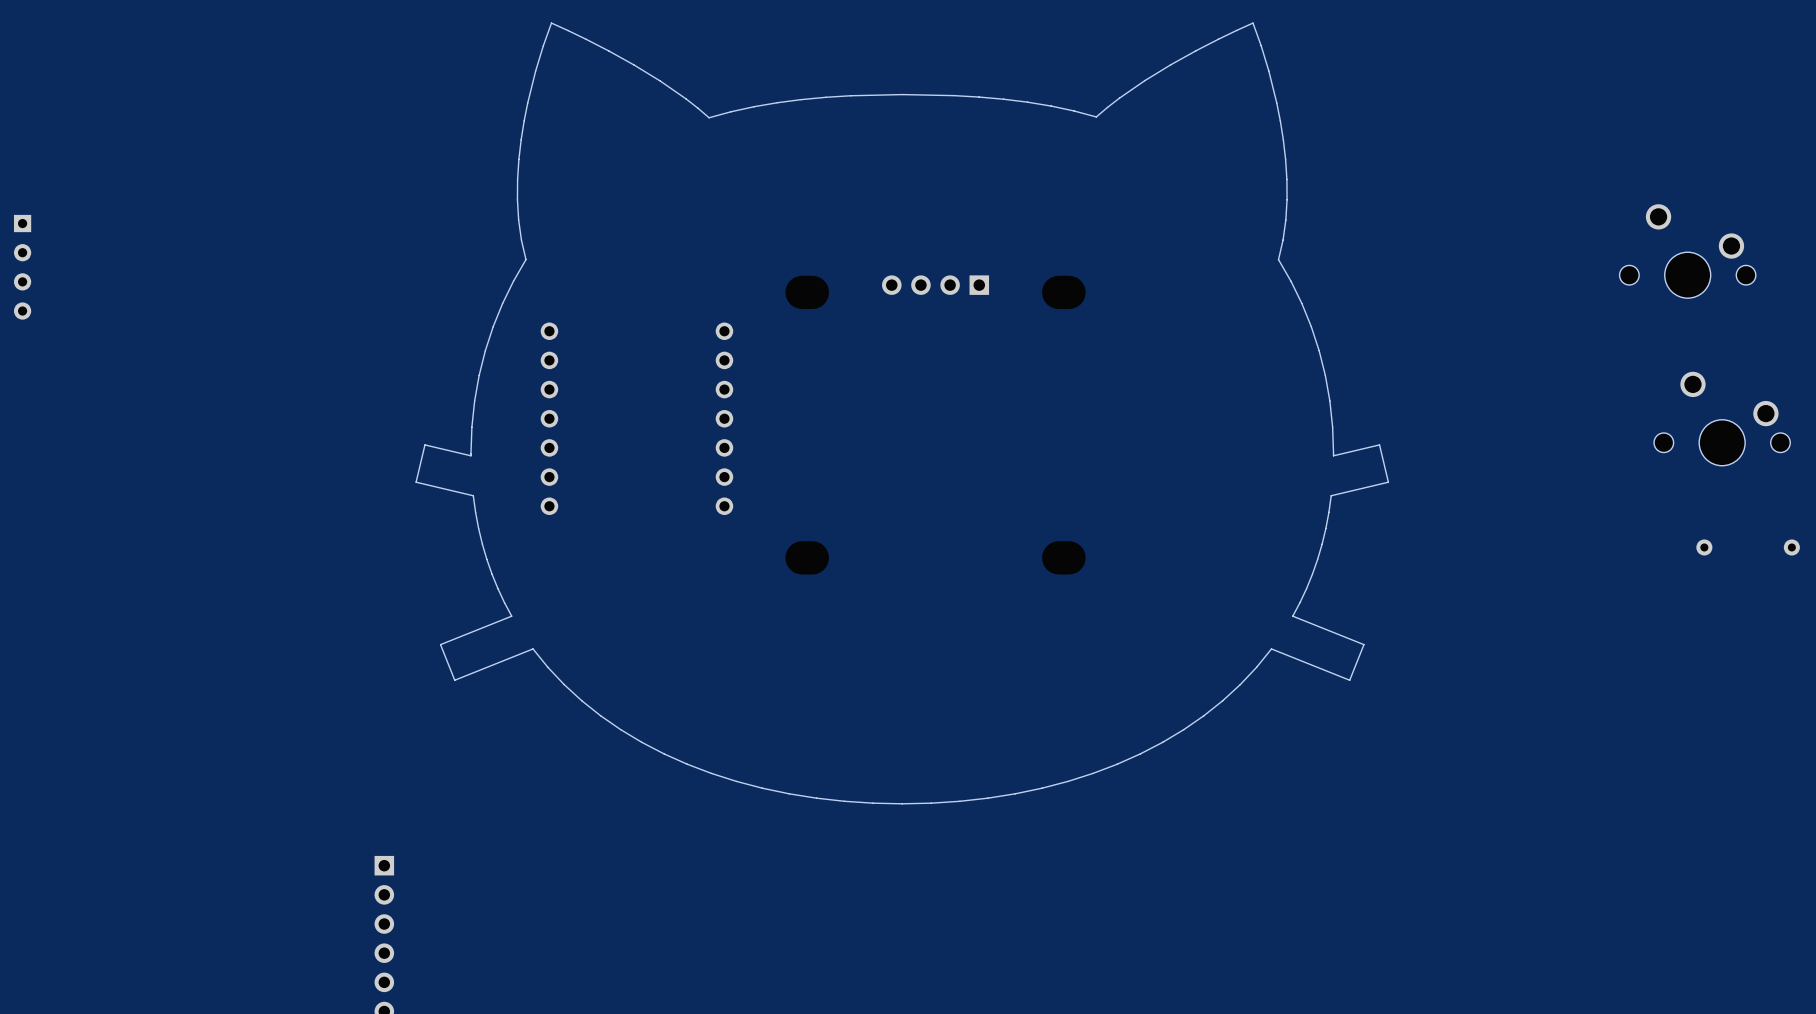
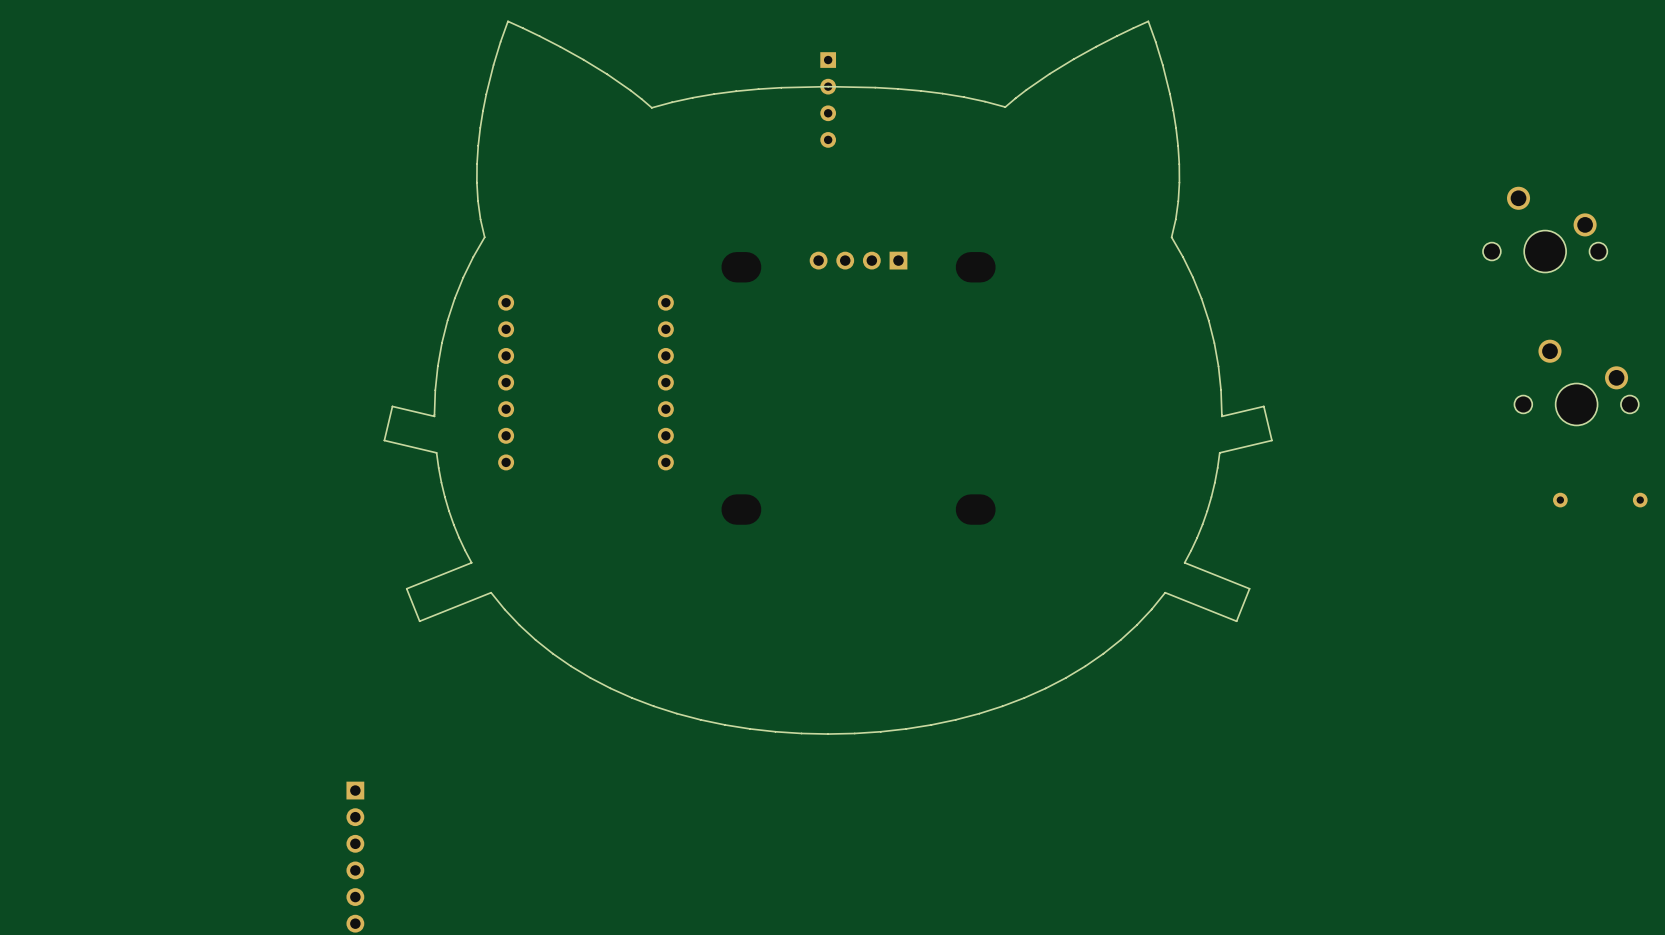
part: none -> (828, 99)
part: (22, 267) -> none

